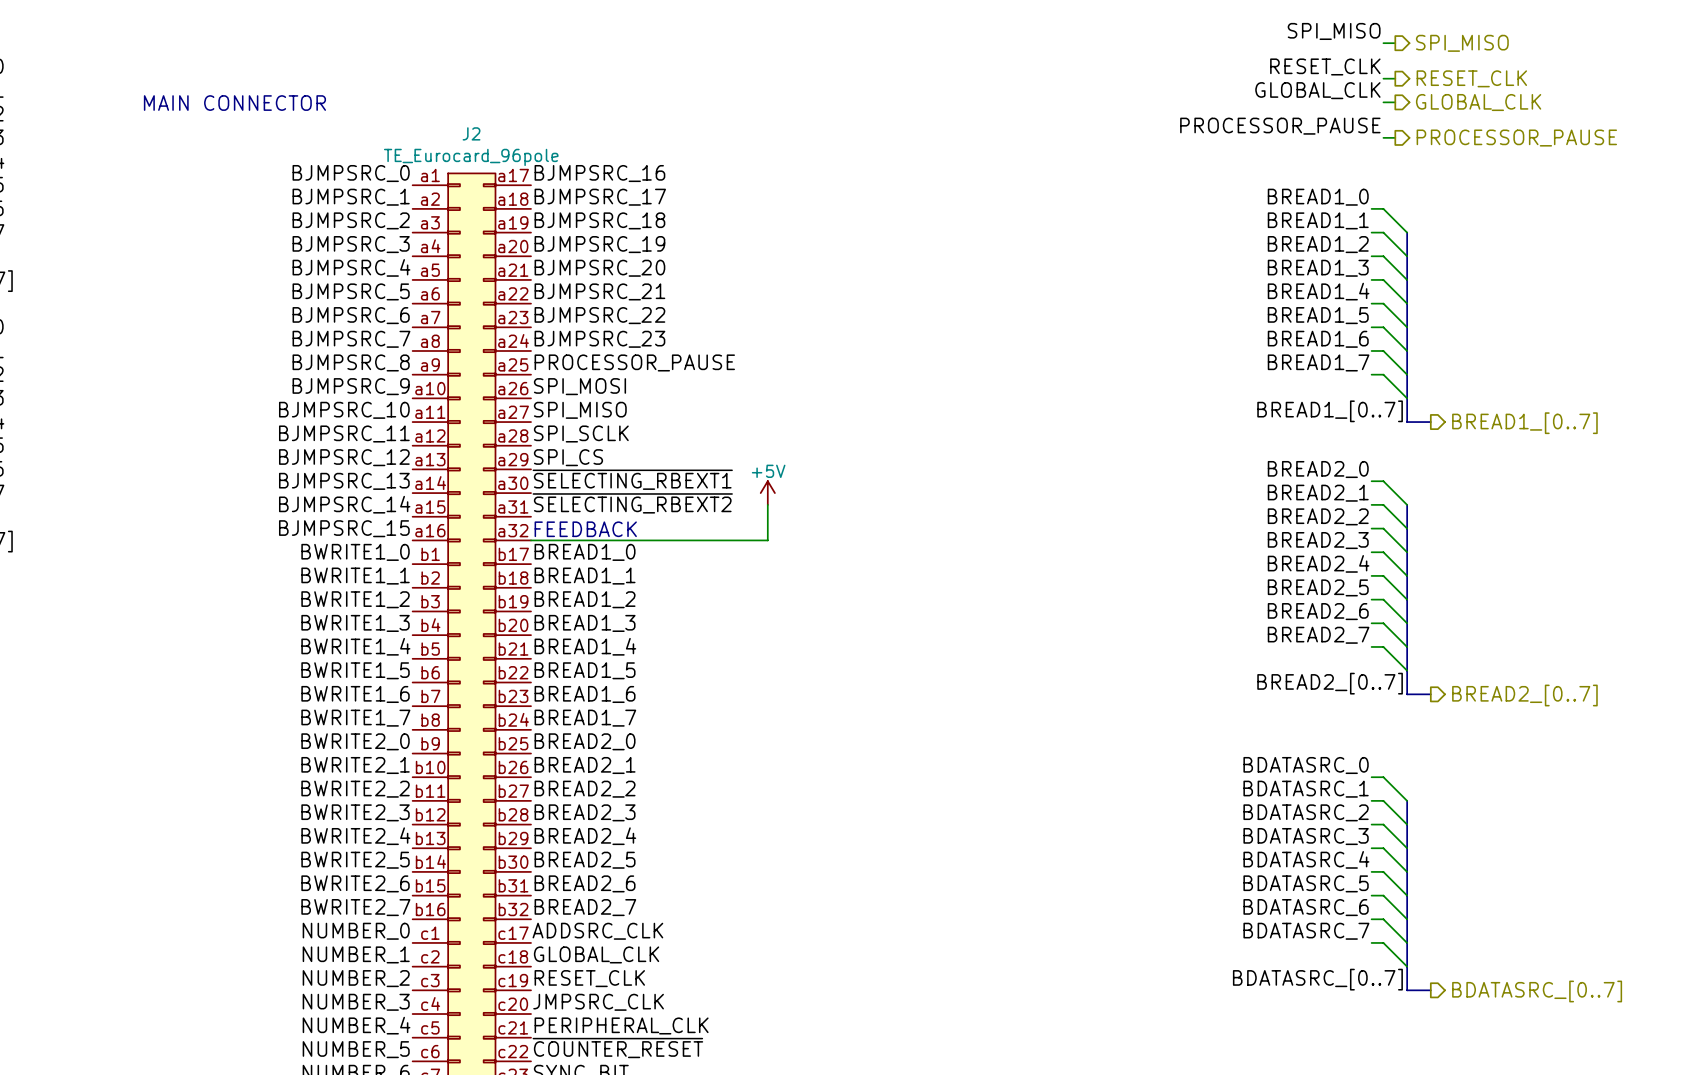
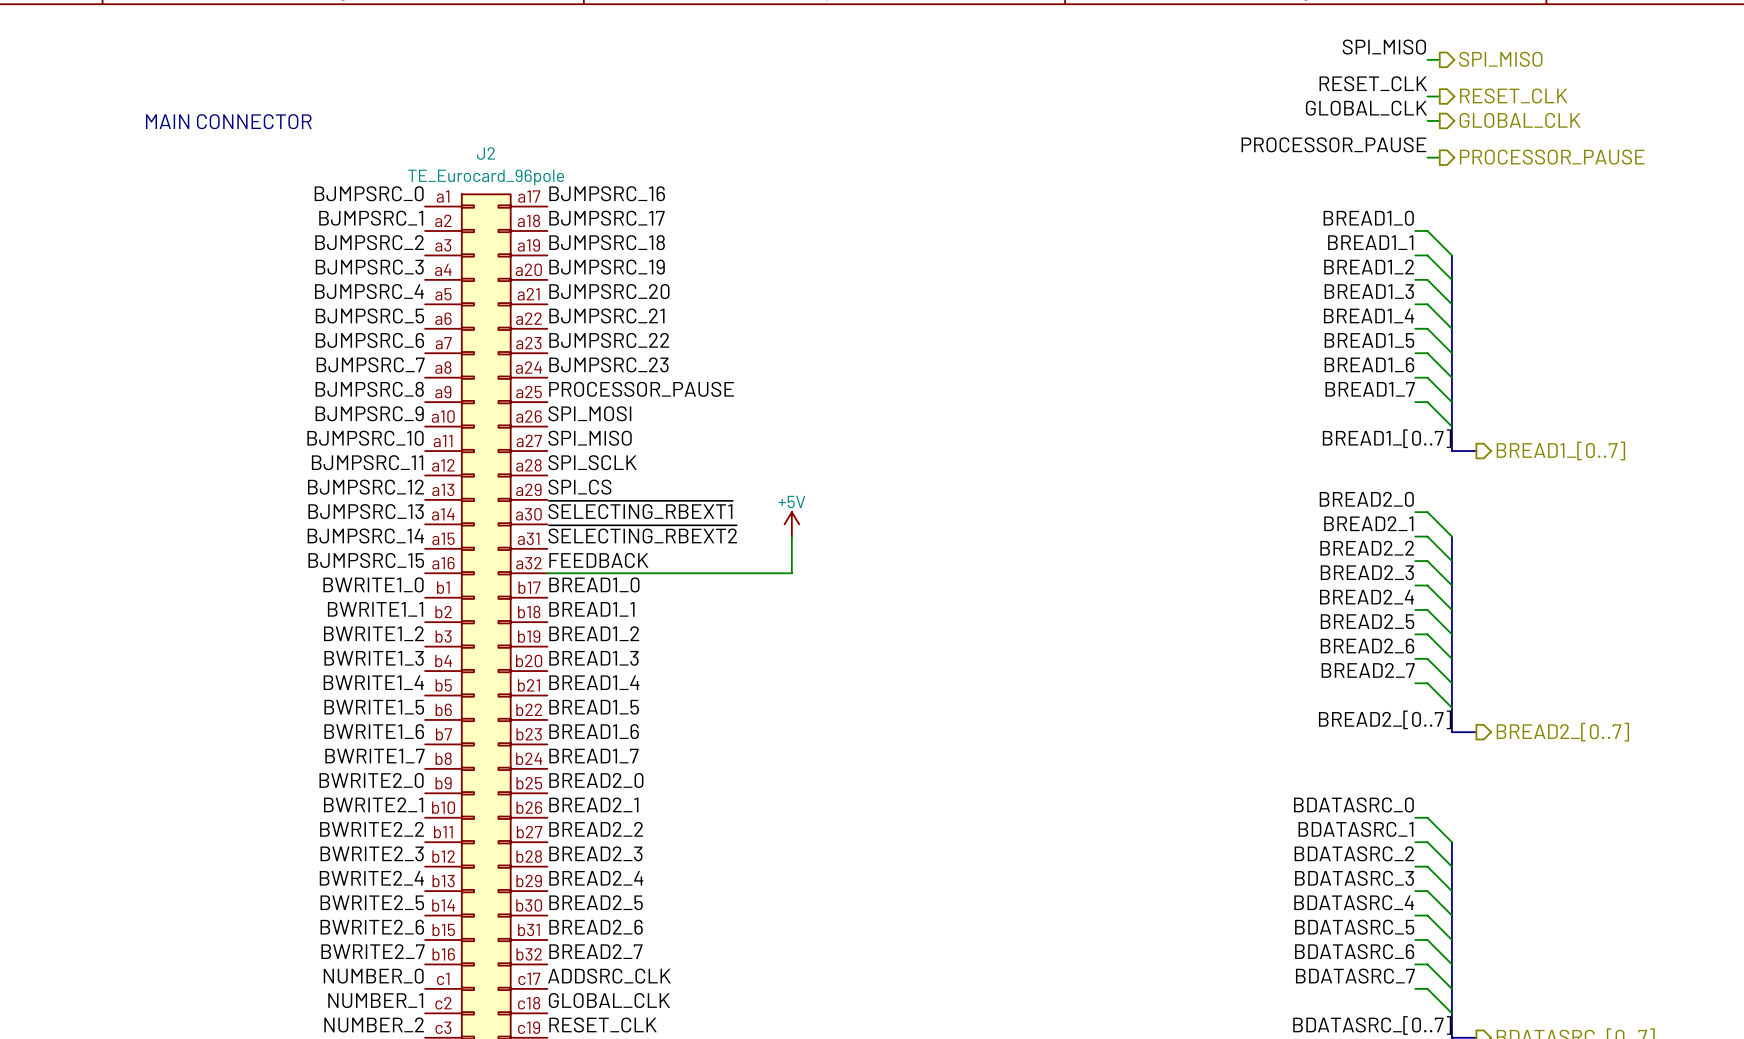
label: none -> FEEDBACK (598, 560)
text: FEEDBACK (585, 529) -> none

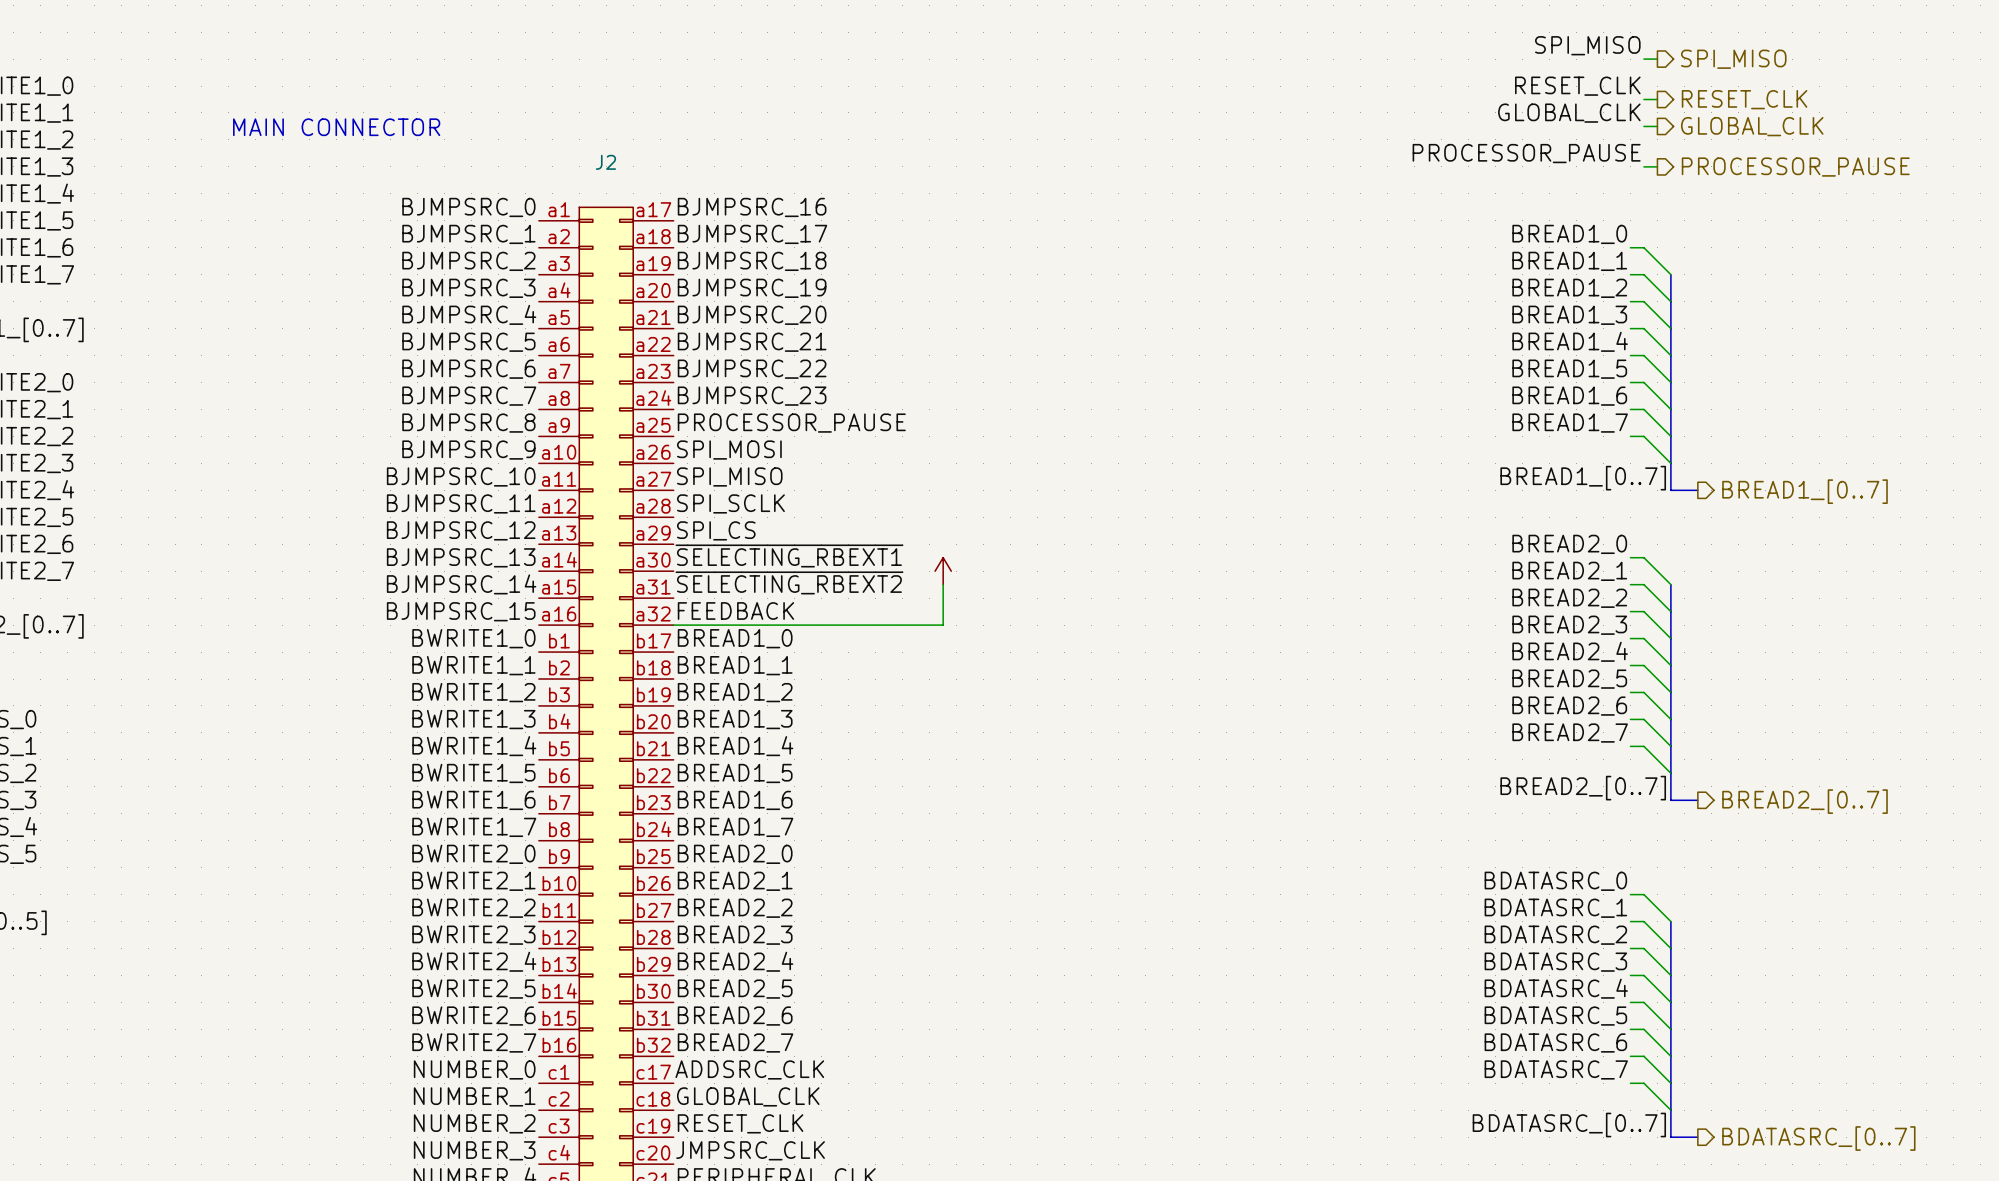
J2 value: TE_Eurocard_96pole (486, 177) -> none
power symbol text: +5V (791, 501) -> none

